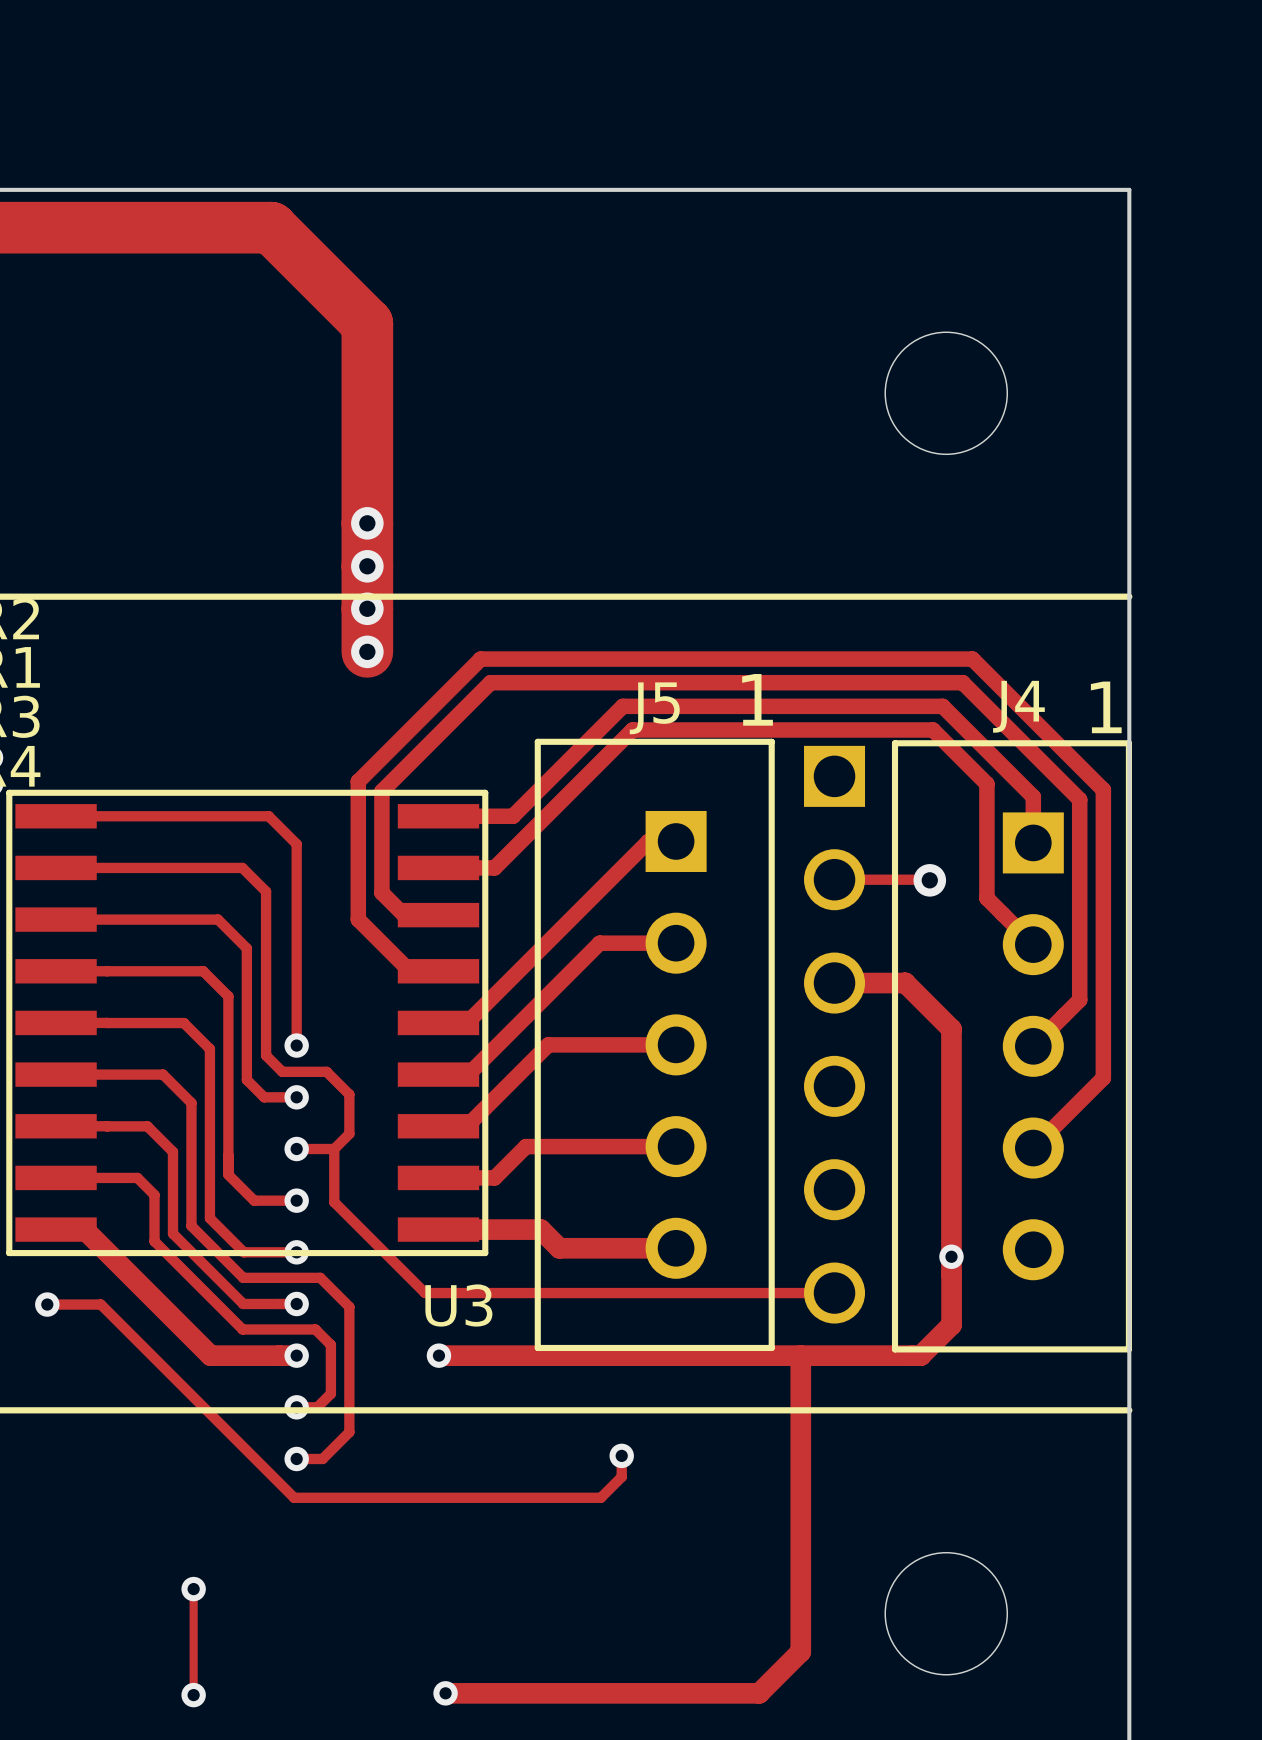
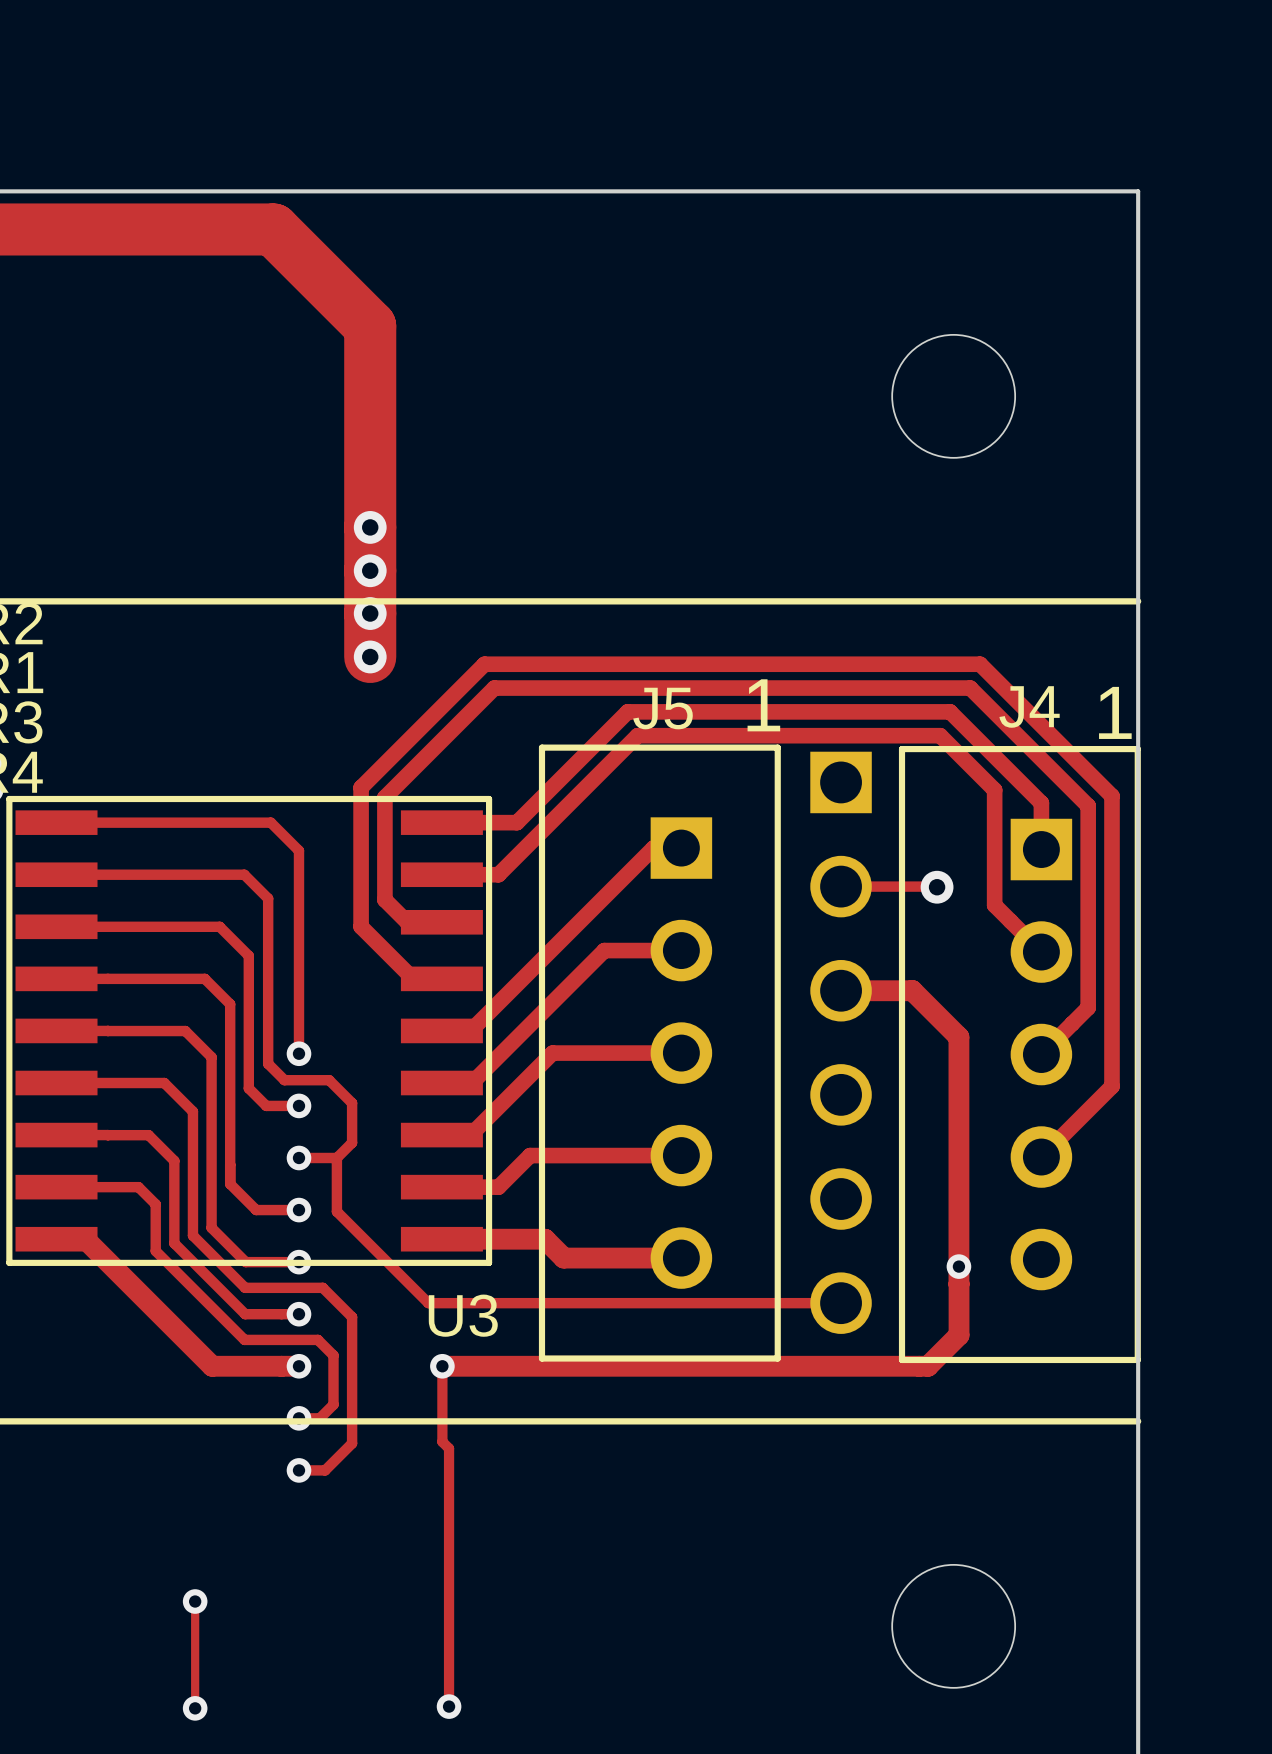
track: (47, 1304) (100, 1304) (294, 1497) (600, 1497) (621, 1476) (621, 1455) -> none
via: (47, 1304) -> none
track: (800, 1355) (800, 1651) (759, 1693) (445, 1693) -> (442, 1366) (442, 1441) (449, 1448) (449, 1706)
via: (621, 1455) -> none

